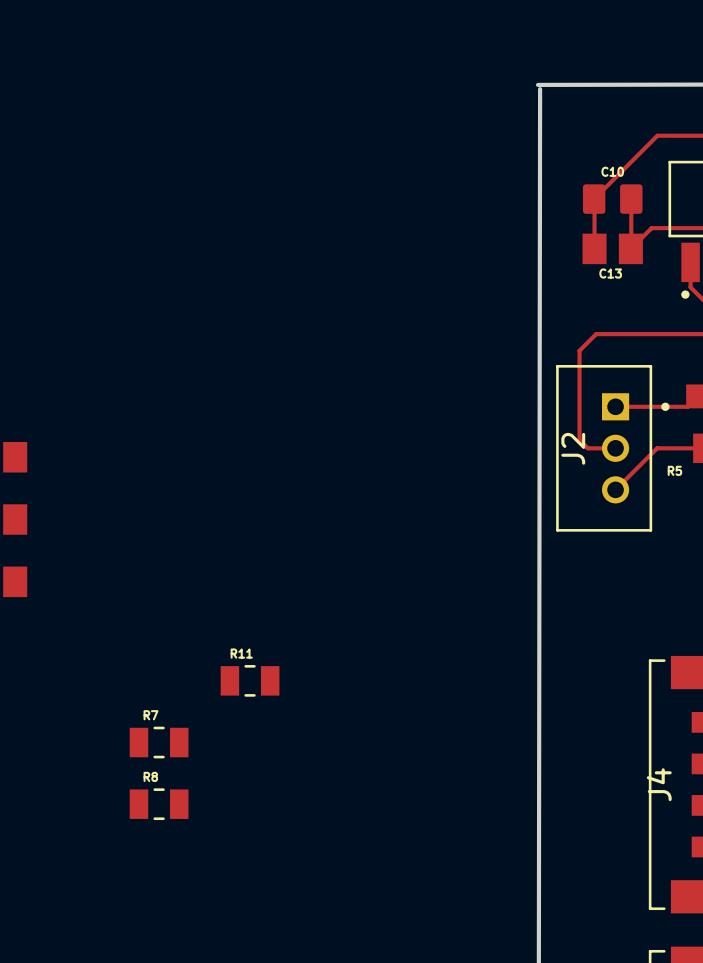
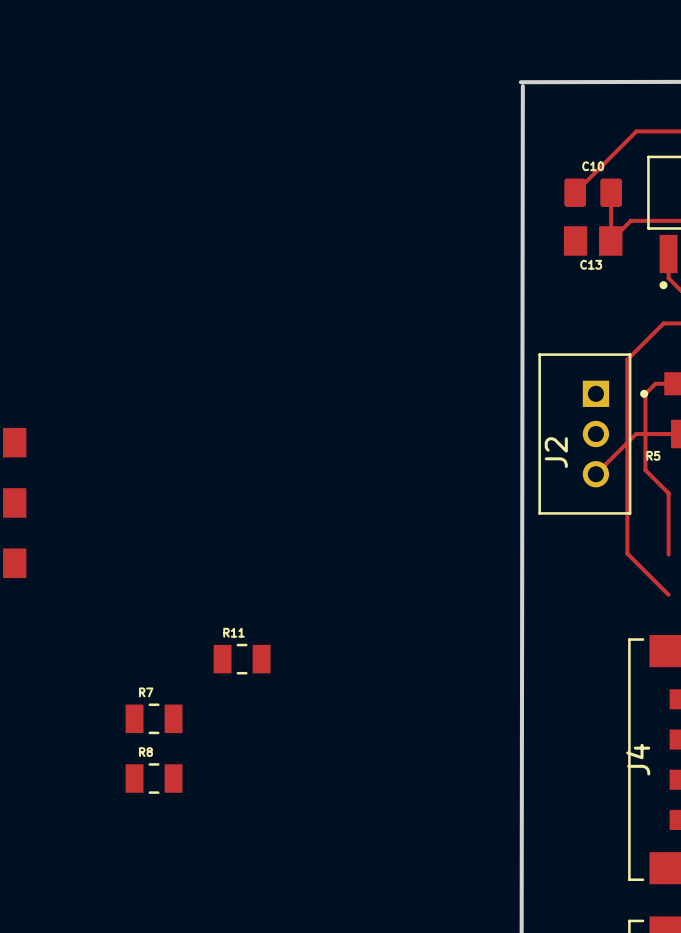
track: (594, 203) (594, 248) -> none
track: (685, 334) (596, 334) (579, 350) (579, 440) (587, 448) (615, 448) -> (663, 323) (627, 359) (627, 553) (668, 594)
track: (698, 396) (687, 406) (615, 406) -> (675, 383) (655, 383) (645, 393) (645, 470) (668, 493) (668, 554)
J2 name position: J2 (573, 448) -> J2 (556, 452)

